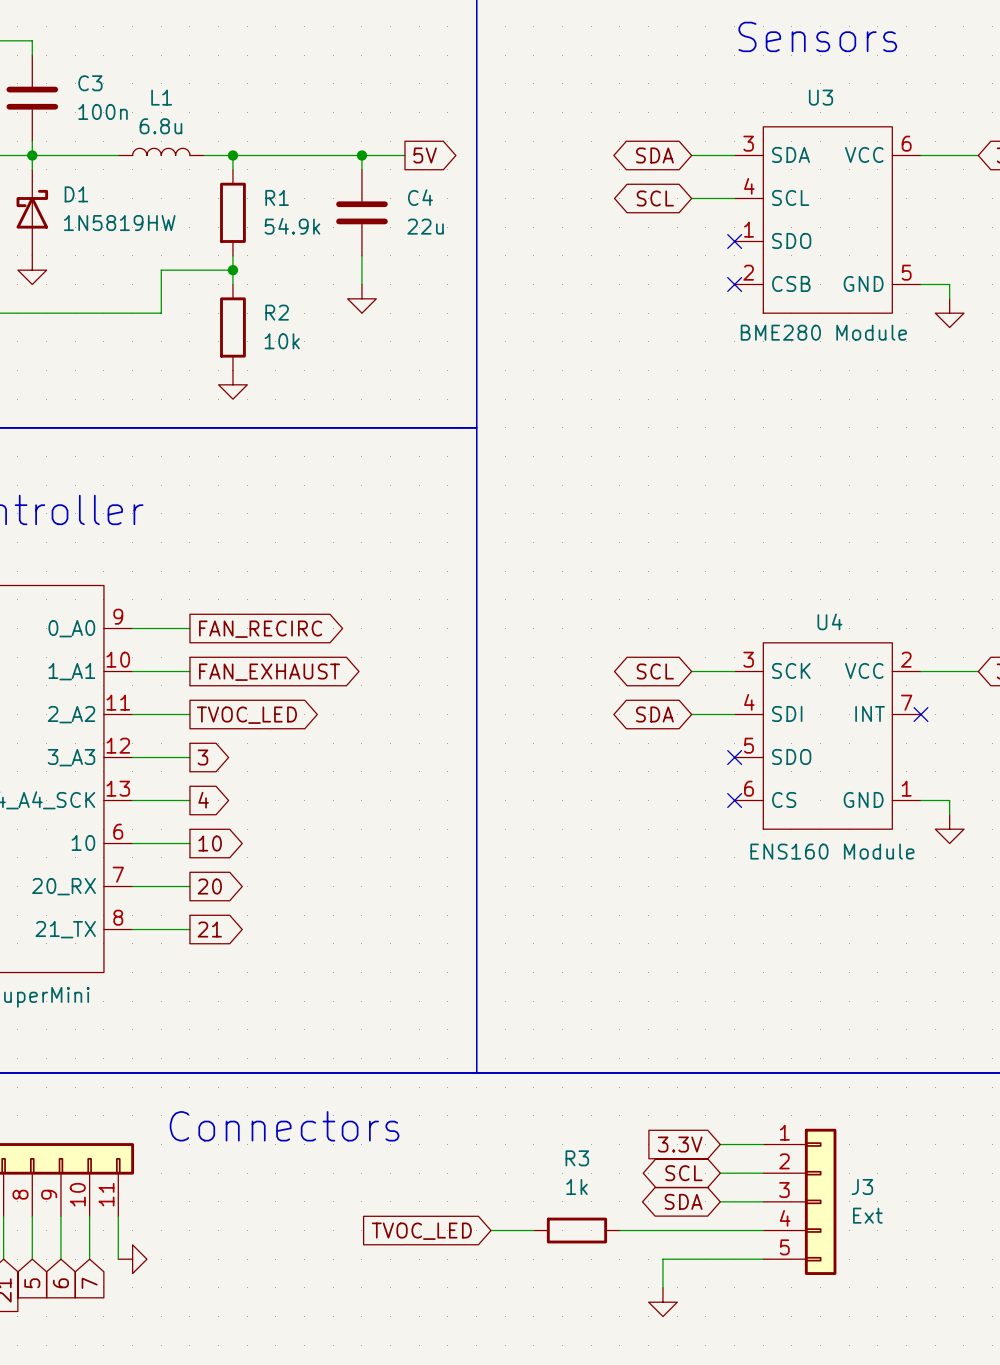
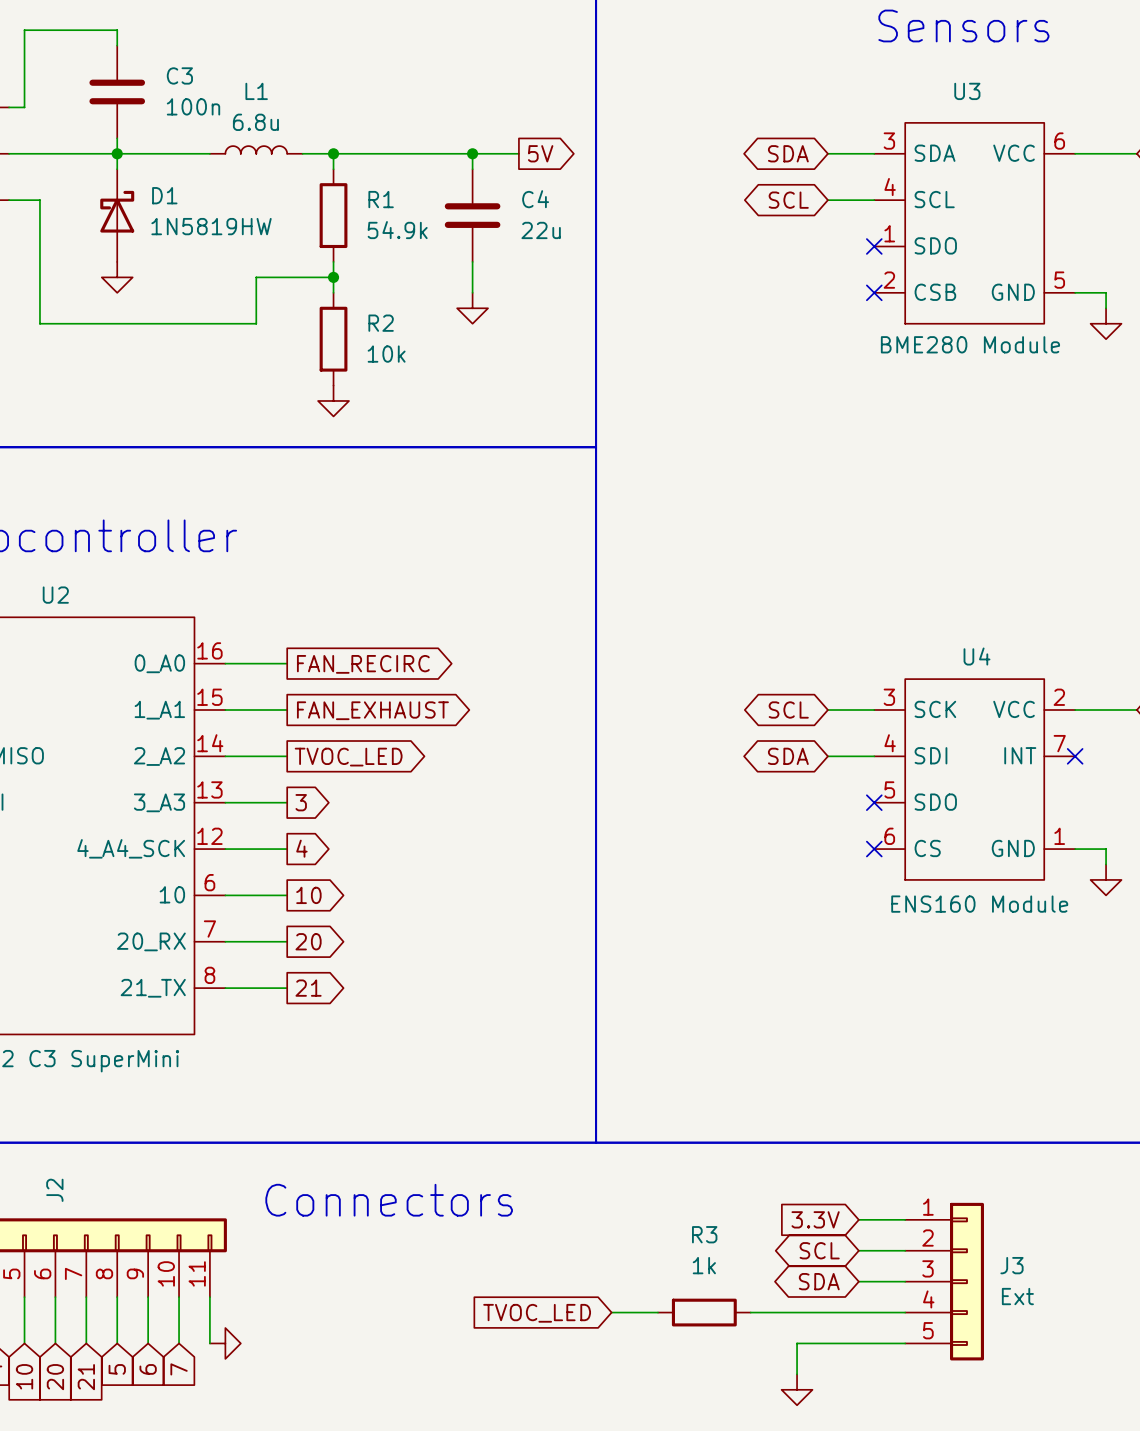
U2 pin number: 9 (118, 616) -> 16 (209, 650)
U2 pin number: 10 (118, 659) -> 15 (209, 697)
U2 pin number: 11 (118, 702) -> 14 (210, 743)
U2 pin number: 12 (118, 745) -> 13 (209, 789)
U2 pin number: 13 (118, 788) -> 12 (209, 836)

